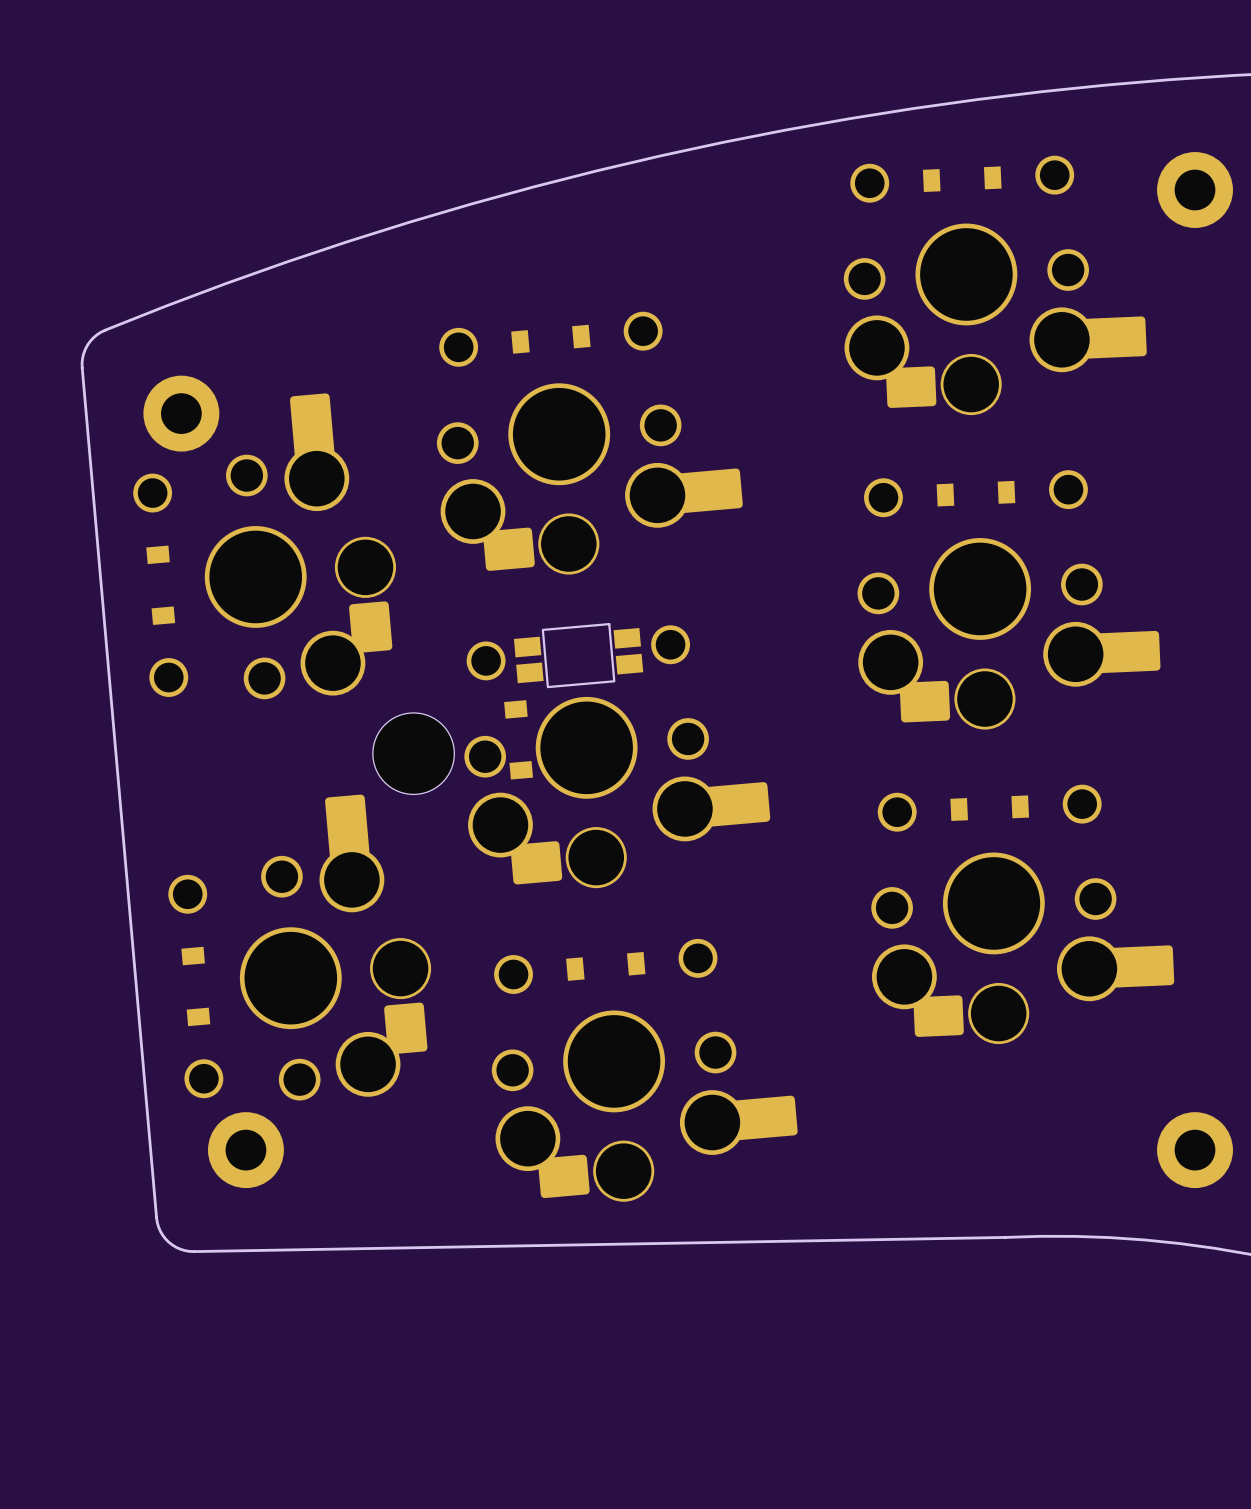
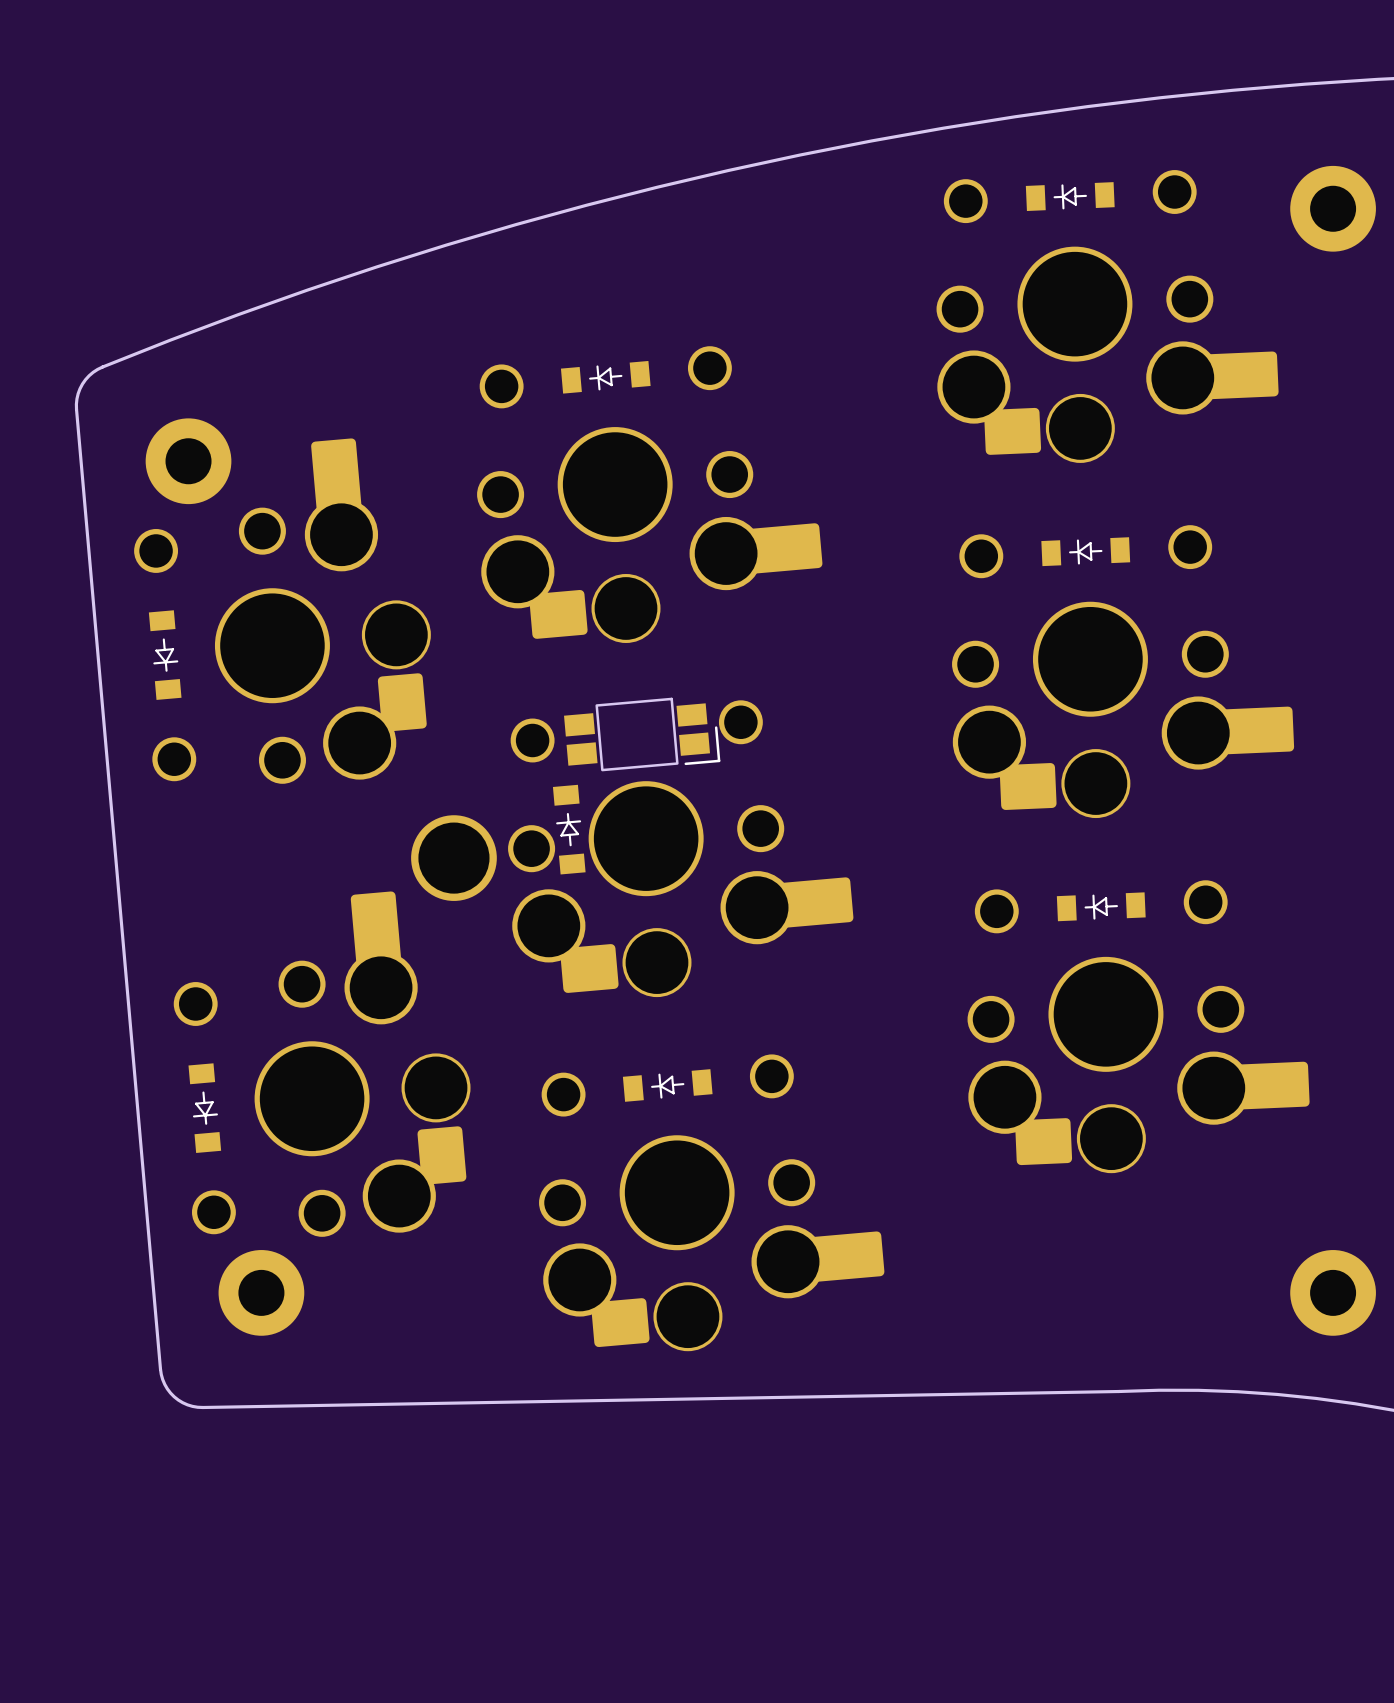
part footprint: [922, 166, 1002, 192] -> [1025, 182, 1115, 212]
part footprint: [511, 324, 591, 354] -> [560, 360, 651, 394]
part footprint: [936, 480, 1016, 507] -> [1041, 537, 1131, 567]
part footprint: [146, 545, 176, 625] -> [148, 610, 182, 700]
part footprint: [513, 622, 644, 689] -> [564, 697, 721, 772]
part footprint: [504, 700, 534, 780] -> [552, 784, 586, 875]
part footprint: [372, 712, 455, 795] -> [411, 815, 497, 901]
part footprint: [950, 795, 1030, 821] -> [1056, 892, 1146, 922]
part footprint: [181, 946, 211, 1027] -> [188, 1063, 222, 1153]
part footprint: [566, 951, 646, 981] -> [622, 1069, 713, 1102]

